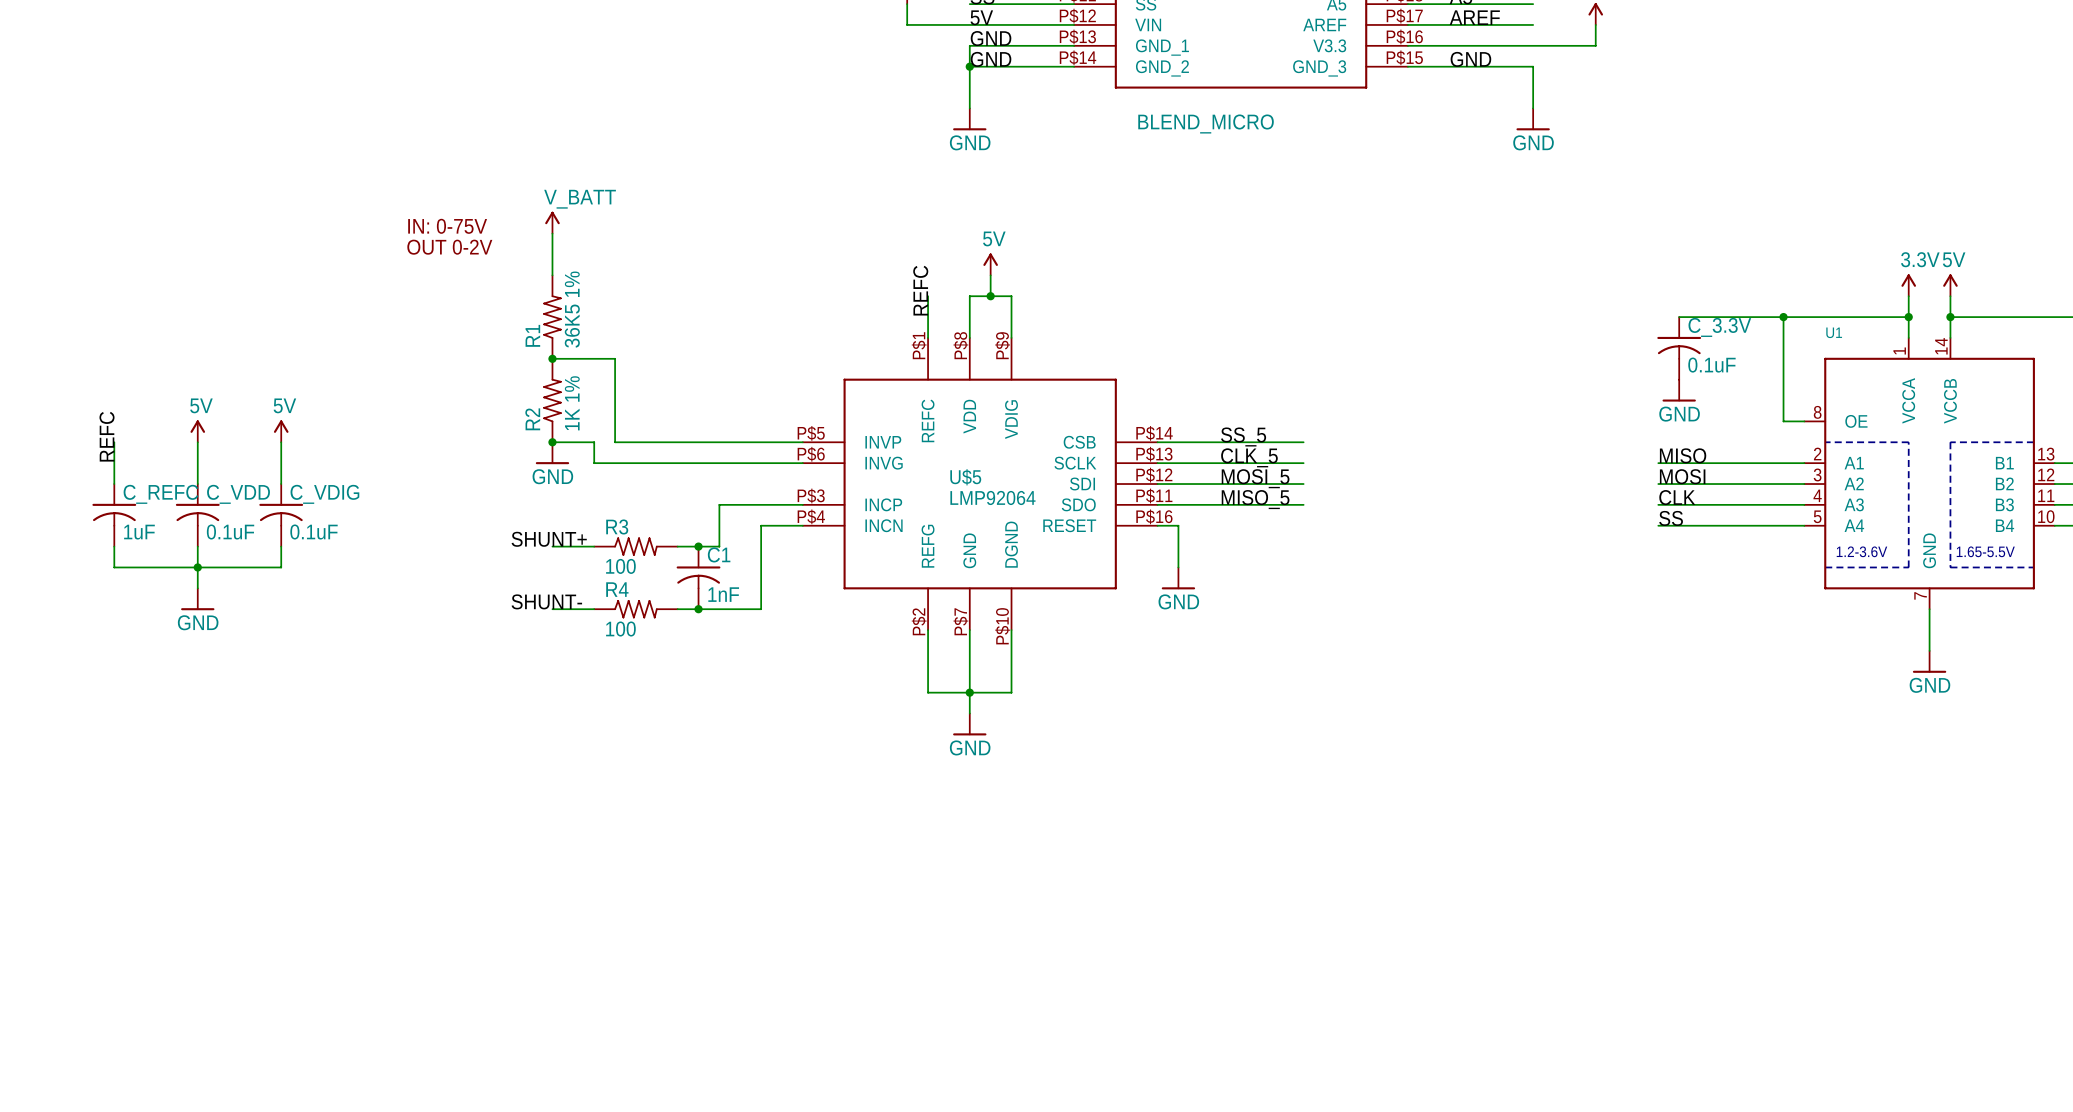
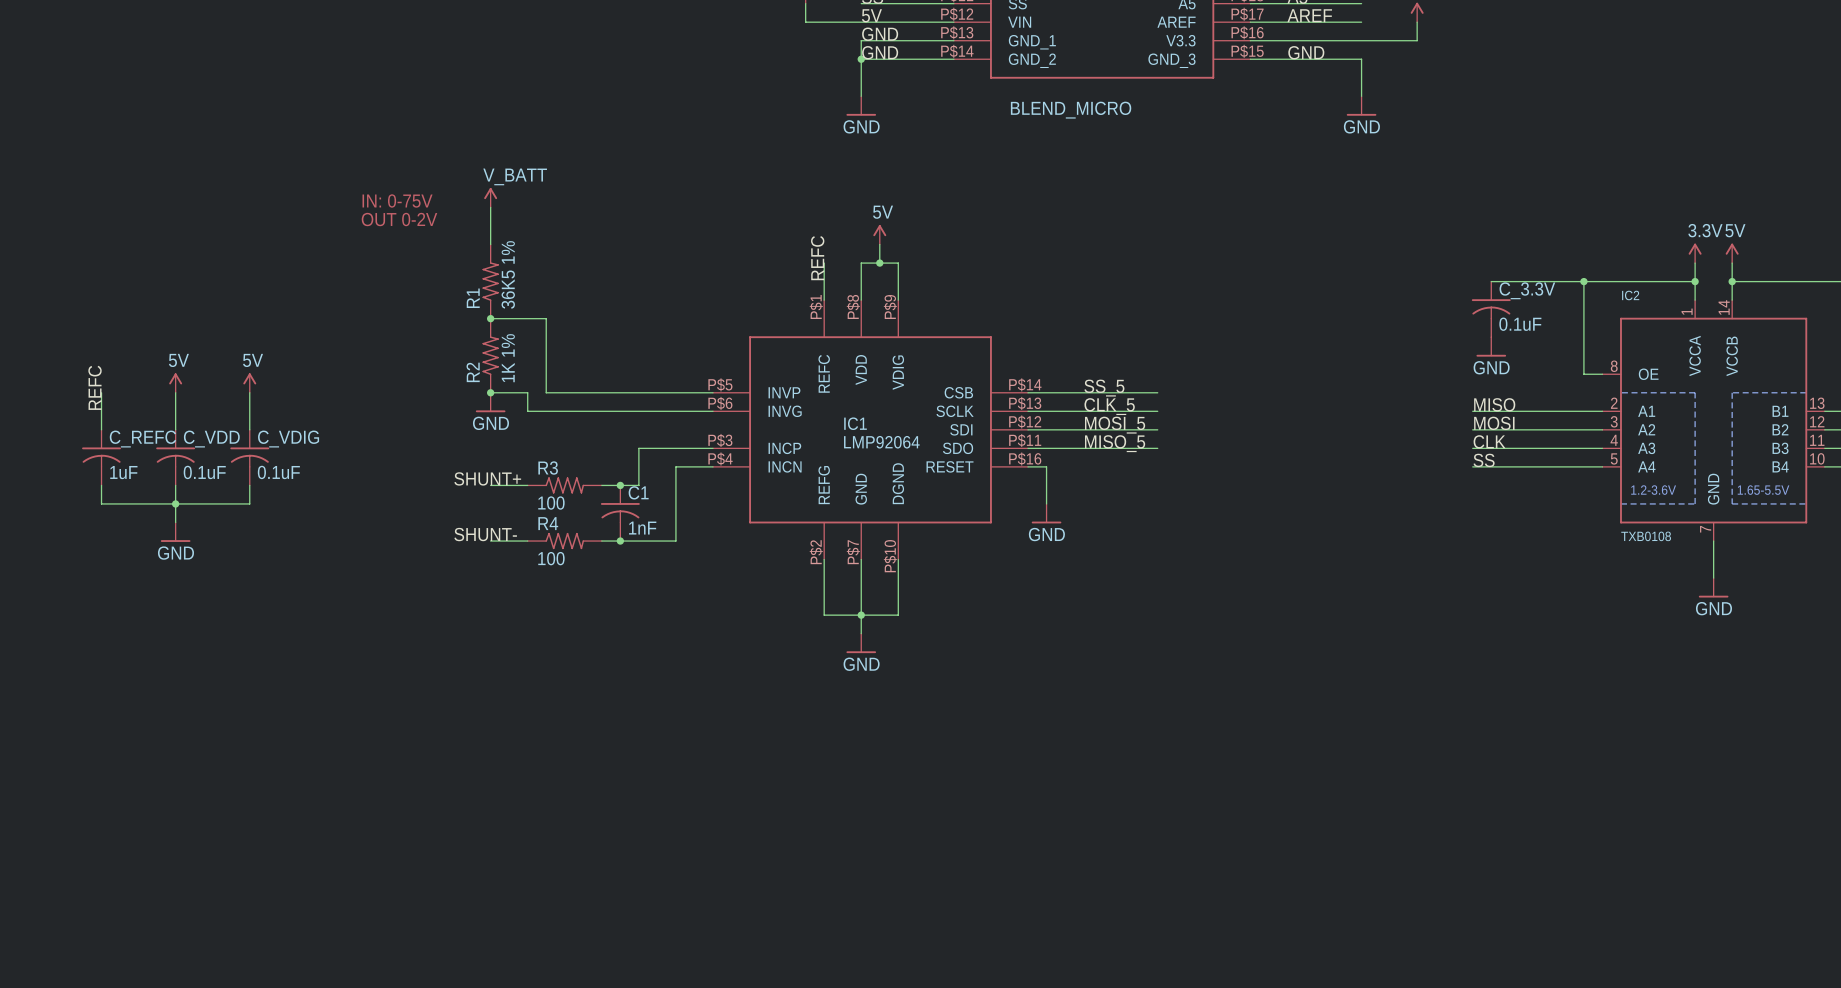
U1 name: U1 (1834, 332) -> IC2 (1630, 295)
U$5 name: U$5 (965, 477) -> IC1 (855, 423)
U1 value: none -> TXB0108 (1646, 536)

